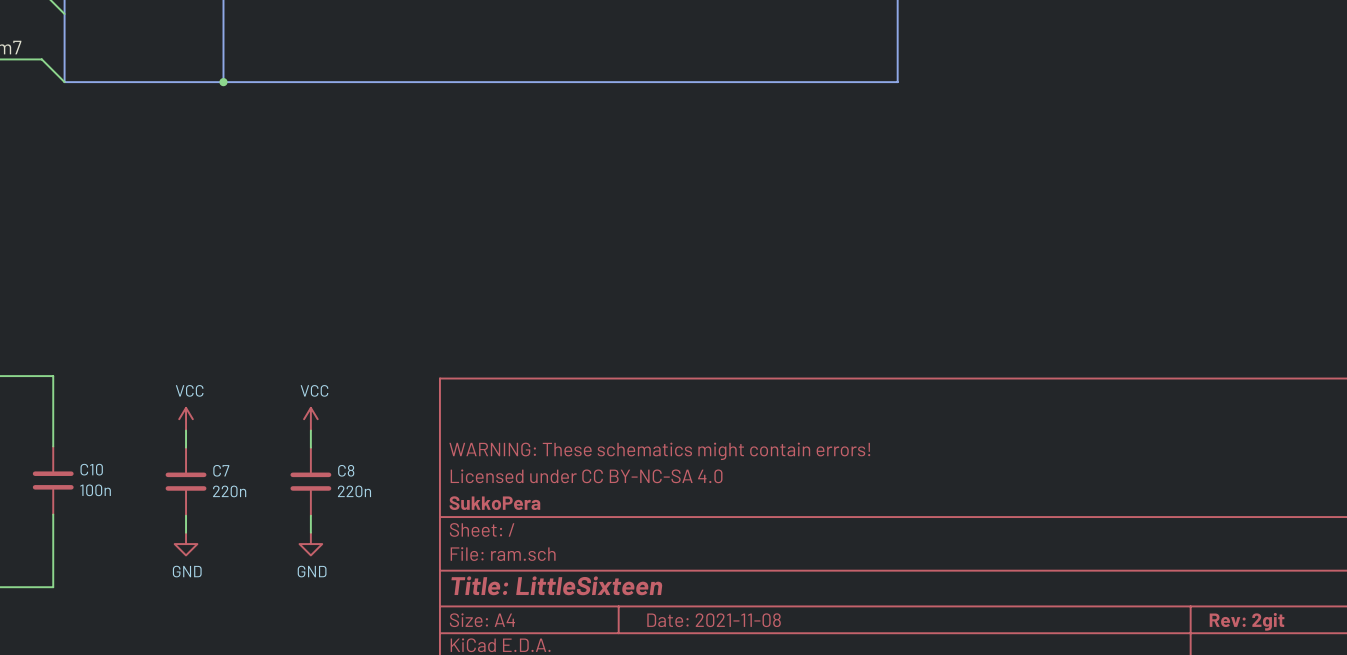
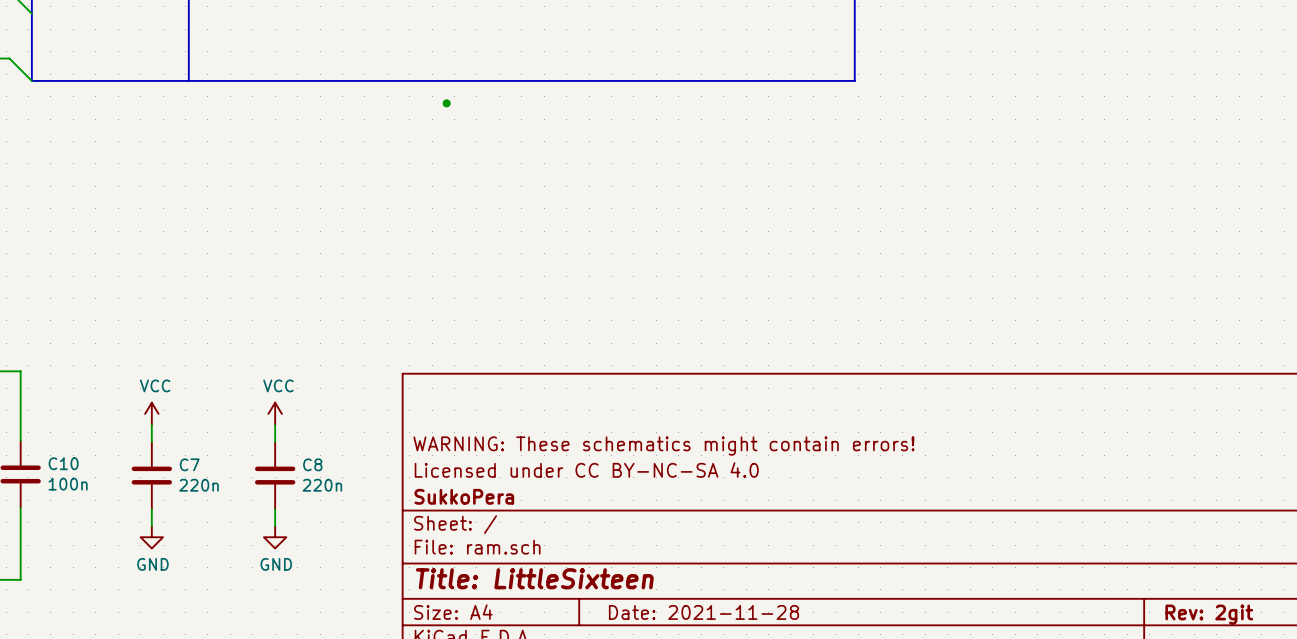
junction: (223, 82) -> none
junction: none -> (446, 103)
title block: Date: 2021-11-08 (714, 620) -> Date: 2021-11-28 (703, 612)

